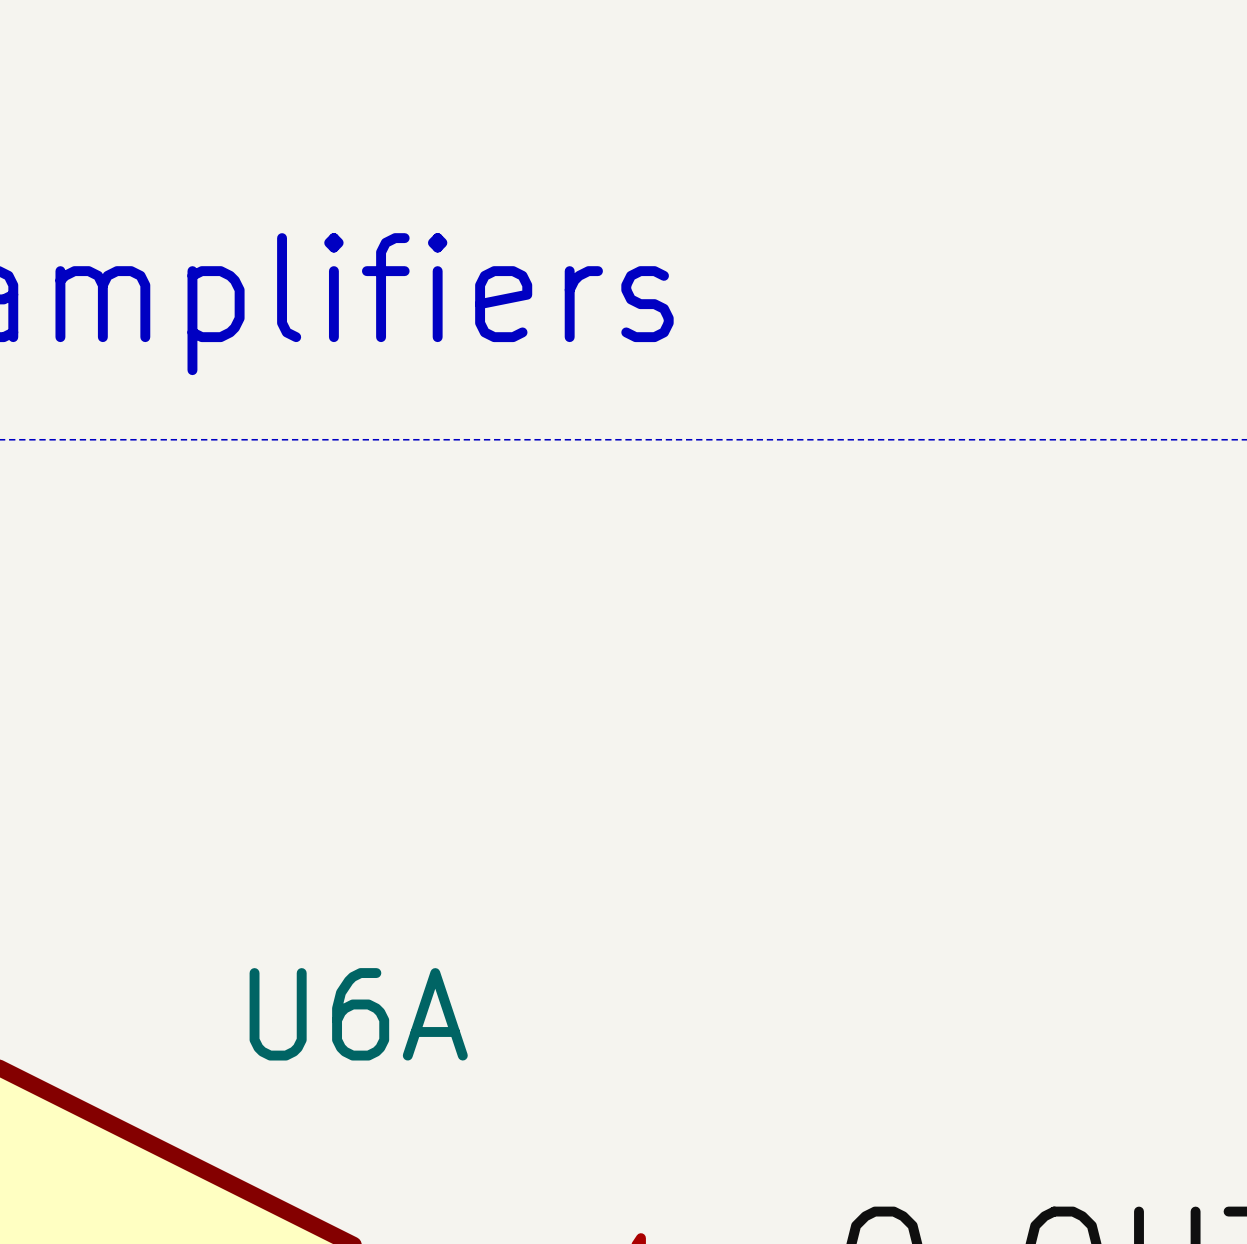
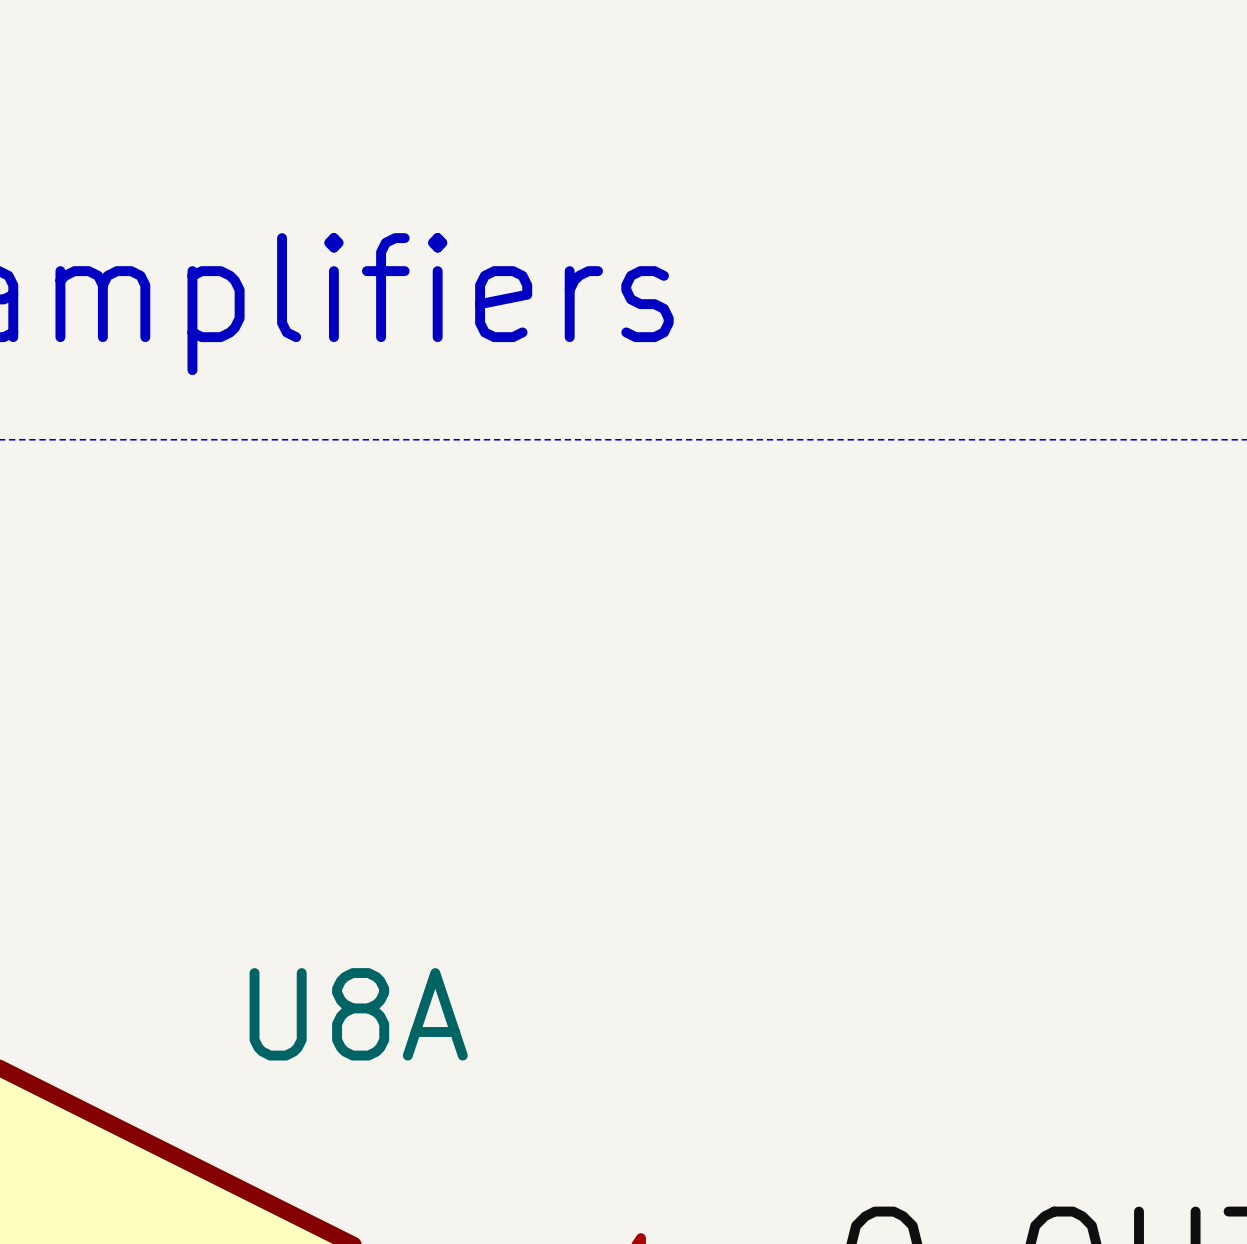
U6A name: U6A (358, 1014) -> U8A (358, 1014)

